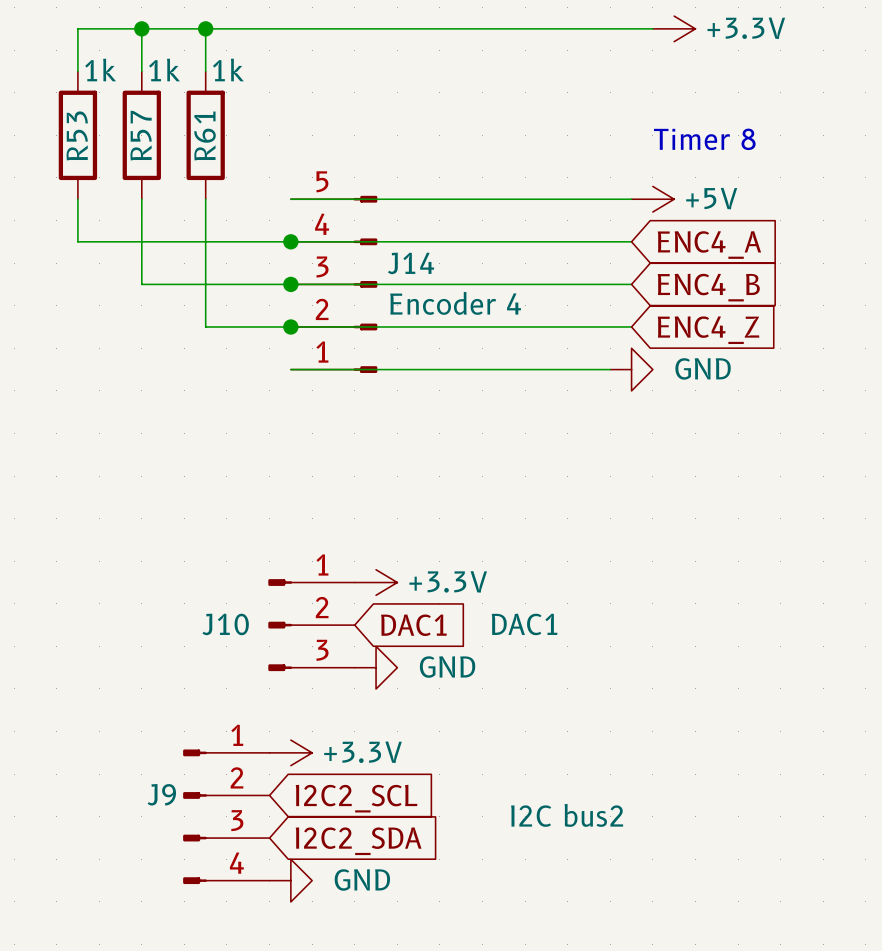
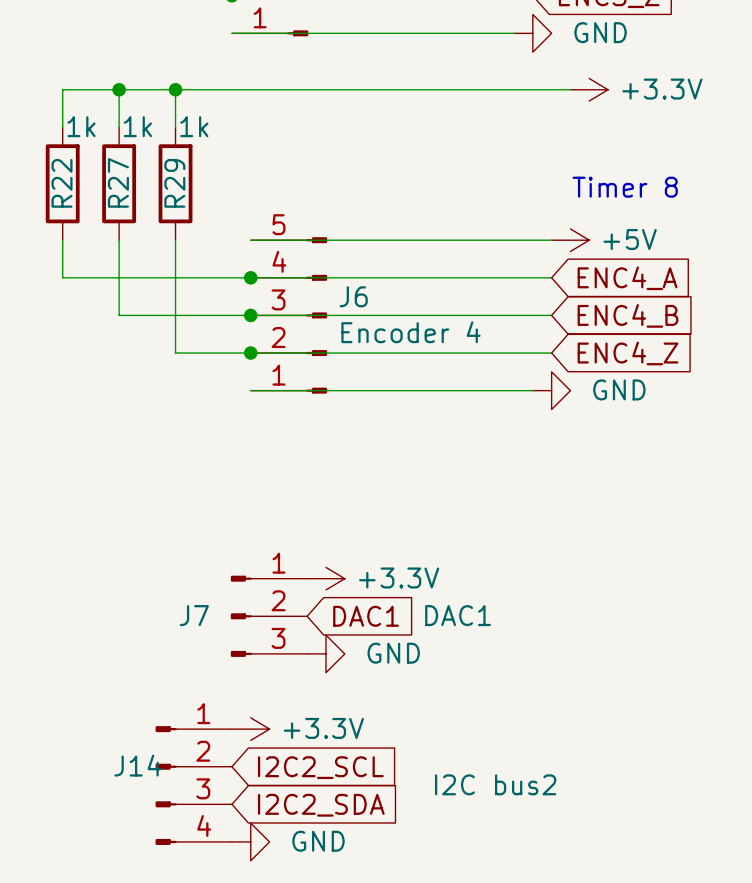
R53 name: R53 (77, 135) -> R22 (62, 183)
R57 name: R57 (141, 135) -> R27 (118, 182)
R61 name: R61 (205, 136) -> R29 (174, 183)
J14 name: J14 (411, 263) -> J6 (353, 296)
J10 name: J10 (225, 624) -> J7 (194, 615)
J9 name: J9 (161, 794) -> J14 (137, 765)

